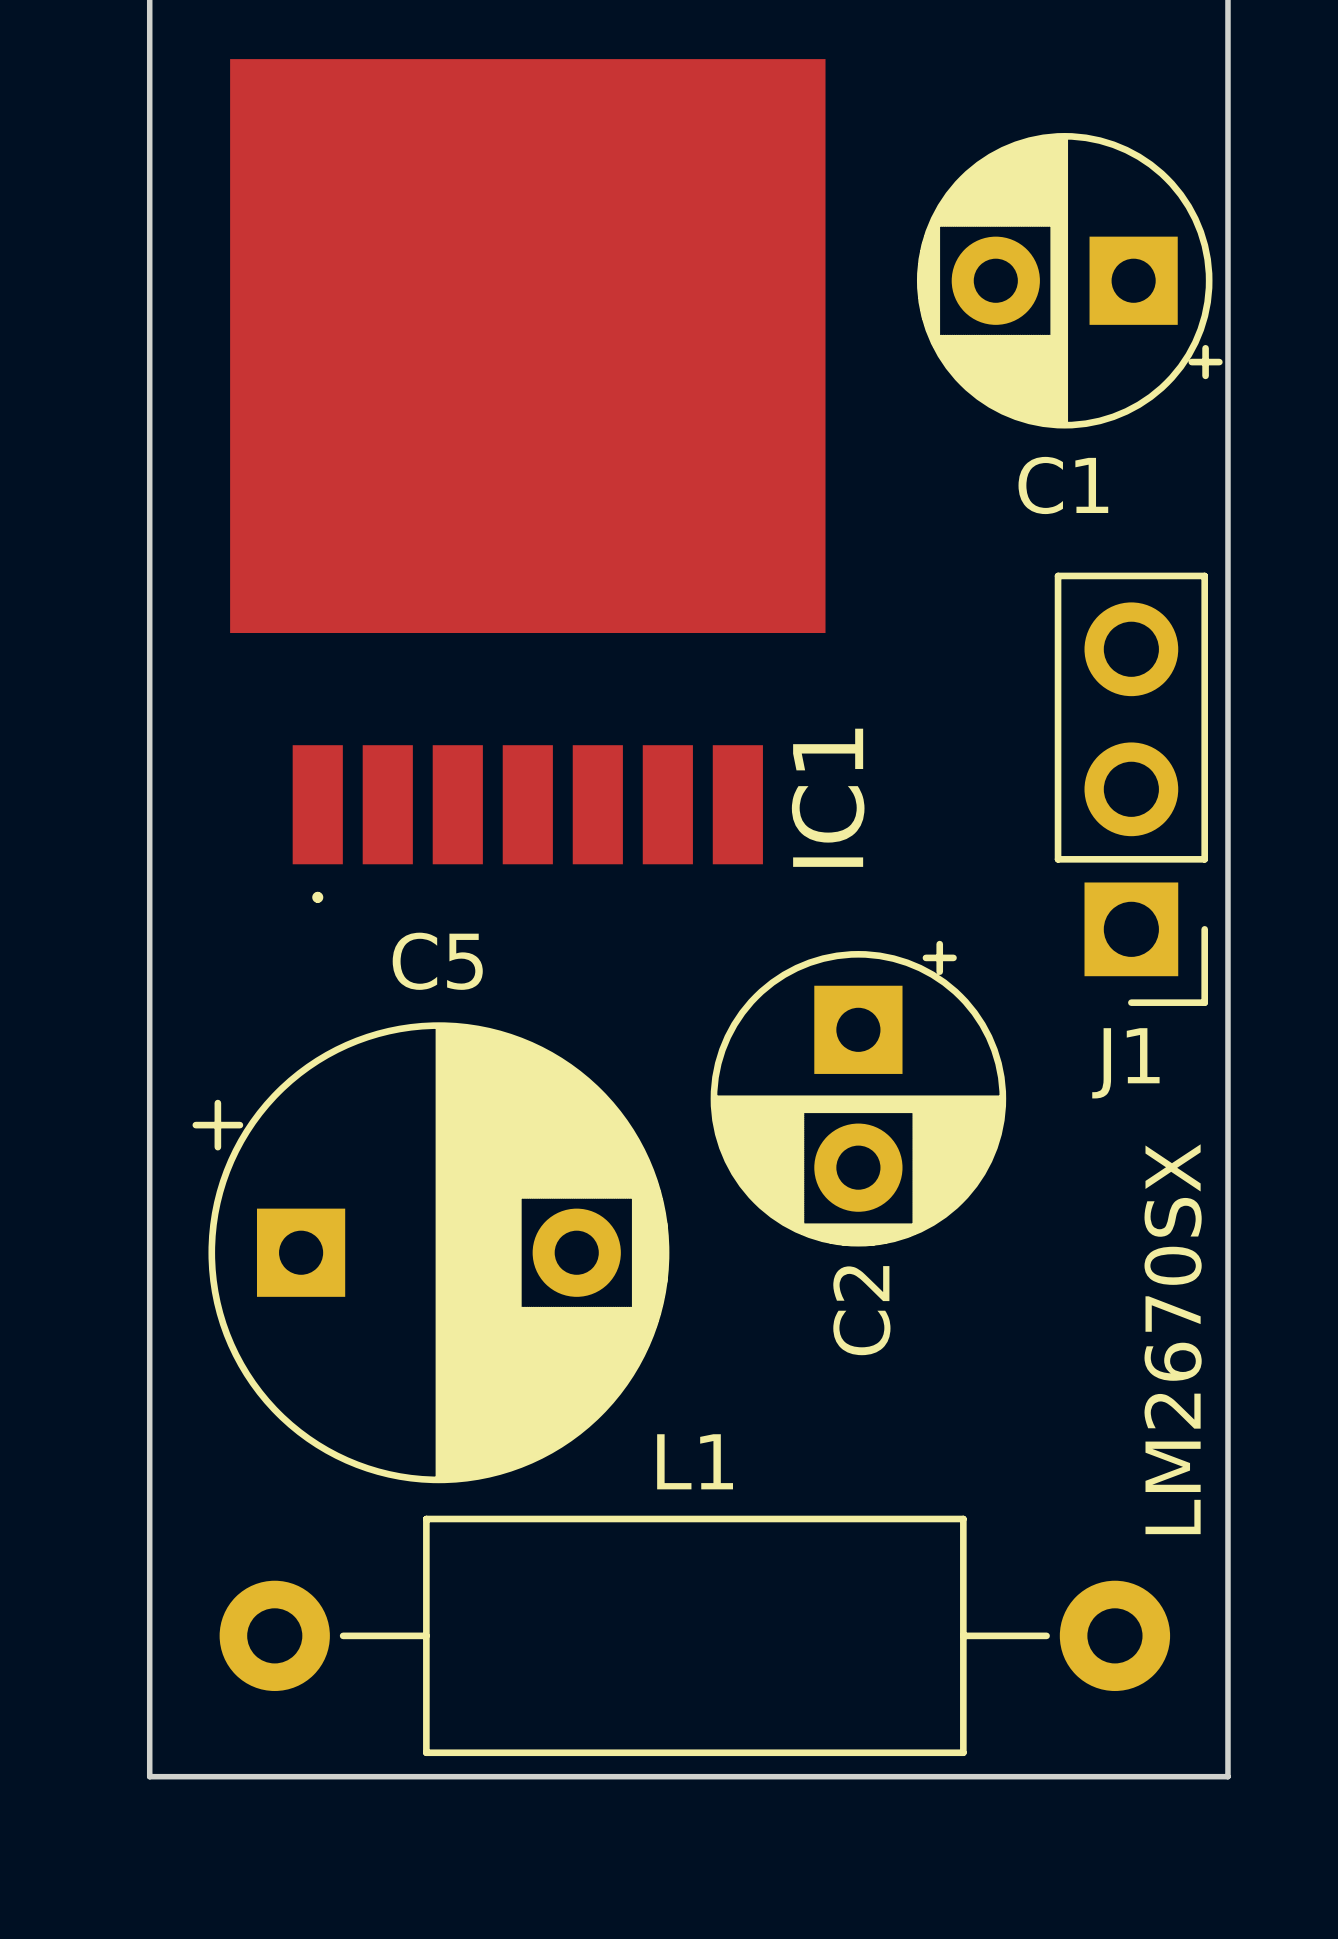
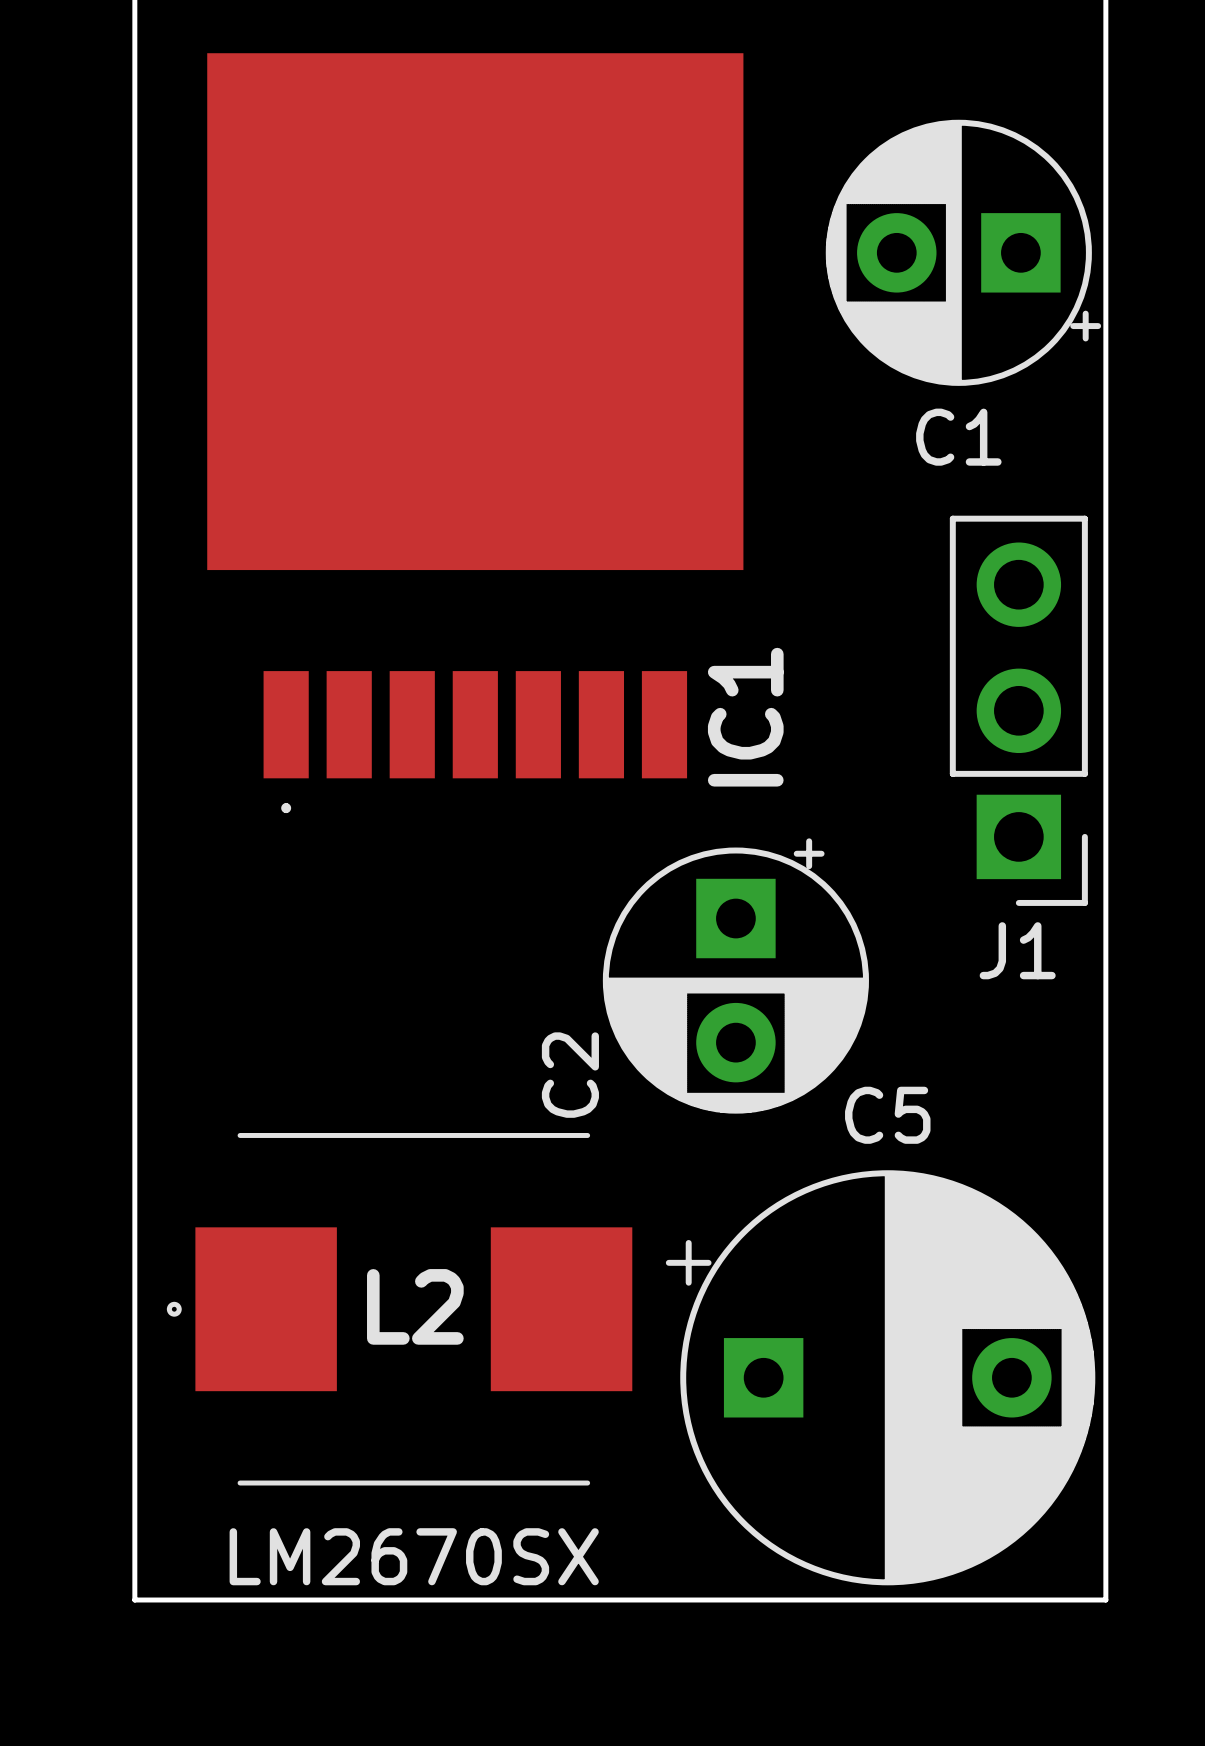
C2 position: (858, 1093) -> (735, 975)
C5 position: (430, 1252) -> (880, 1377)
C2 name position: C2 (861, 1310) -> C2 (570, 1075)
text rotation: 0° (1173, 1339) -> 90° clockwise (414, 1556)
text position: LM2670SX (1173, 1339) -> LM2670SX (414, 1556)
L2: none -> (399, 1309)
L1: (694, 1635) -> none

